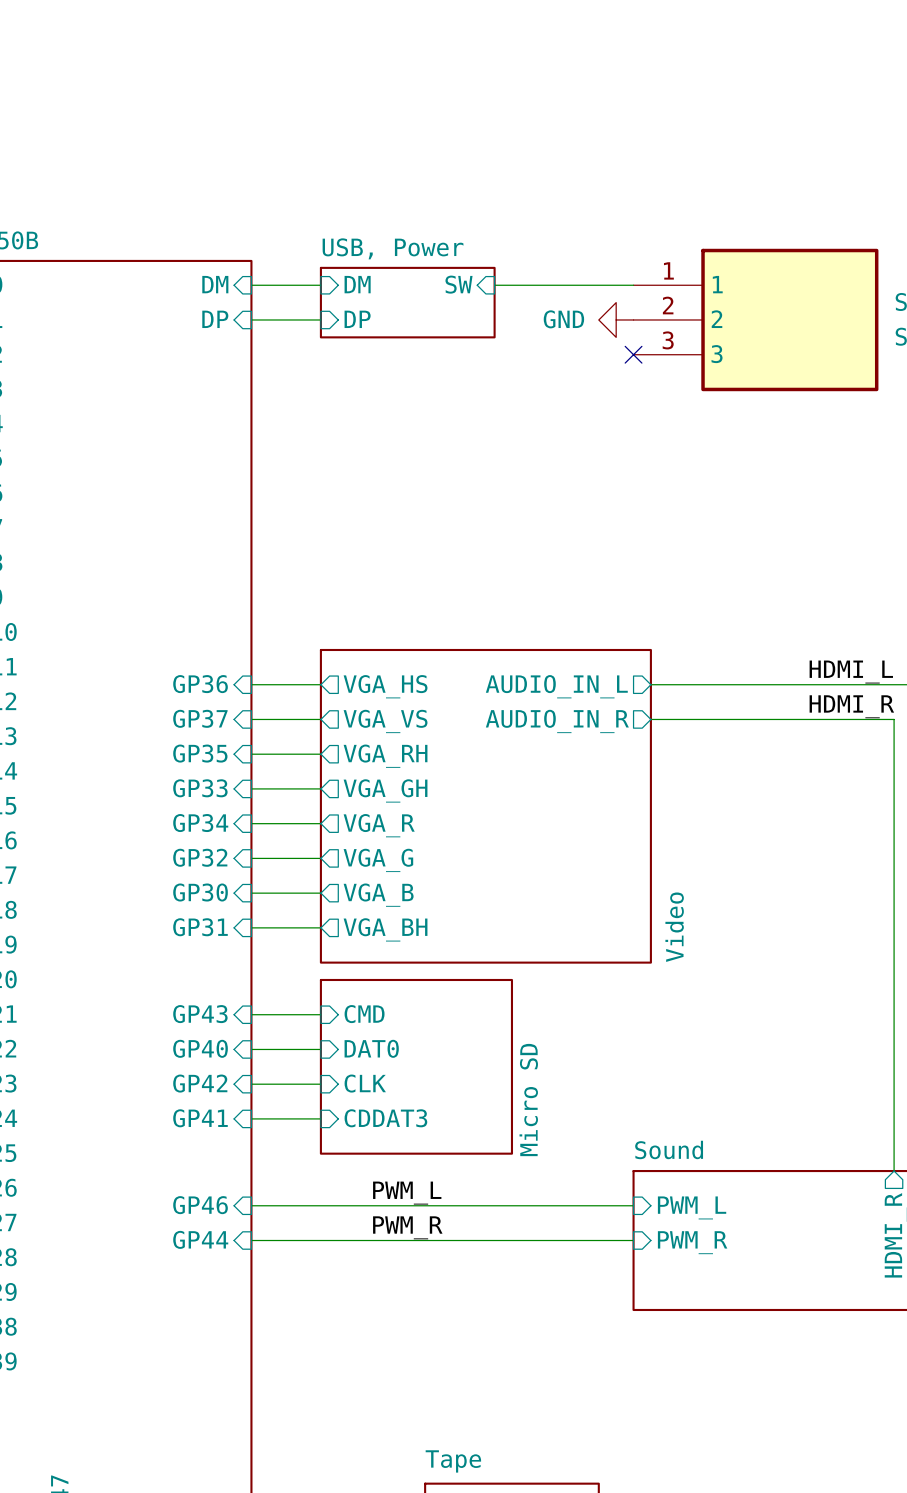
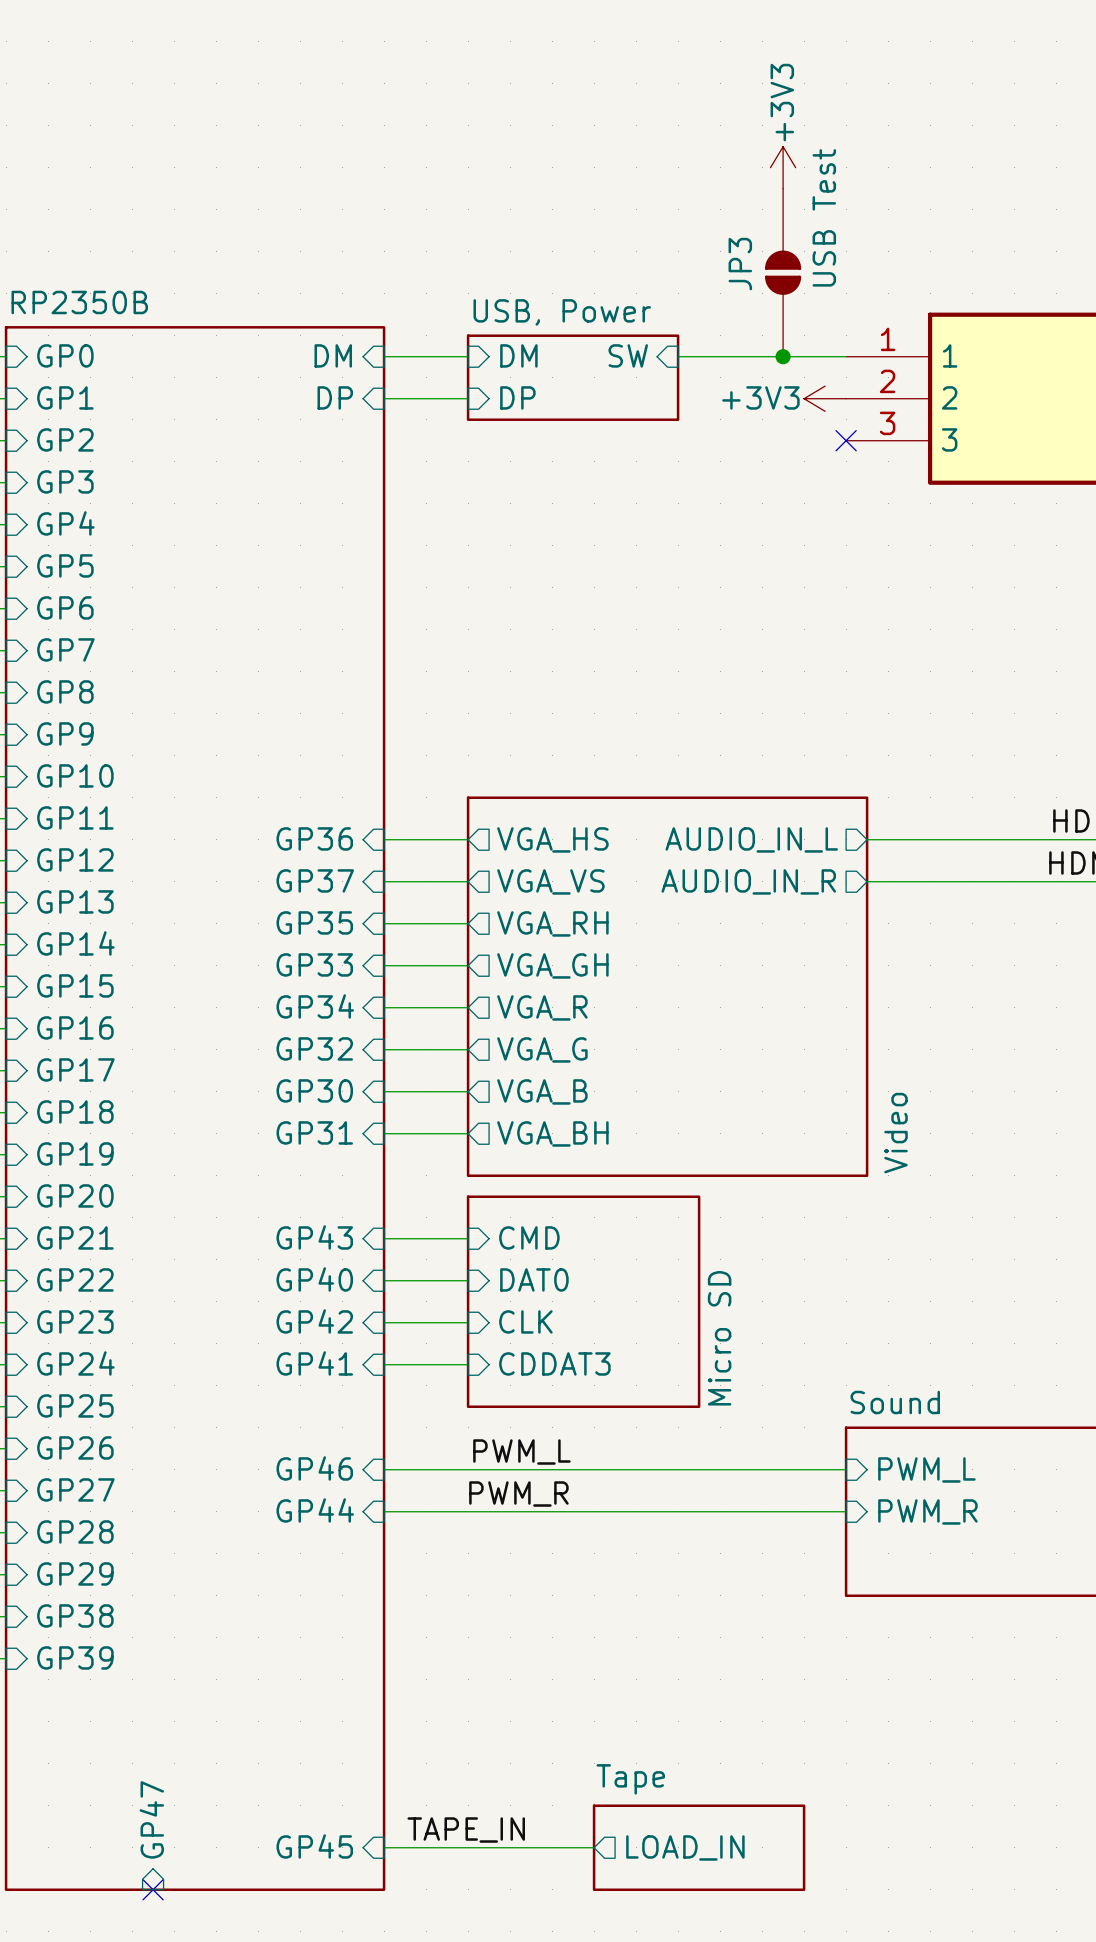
power symbol: none -> +3V3 (783, 167)
JP3: none -> USB Test (783, 272)
junction: none -> (783, 356)
power symbol: GND (616, 319) -> +3V3 (825, 398)
label position: PWM_L (407, 1193) -> PWM_L (521, 1452)
label position: PWM_R (407, 1227) -> PWM_R (518, 1494)

